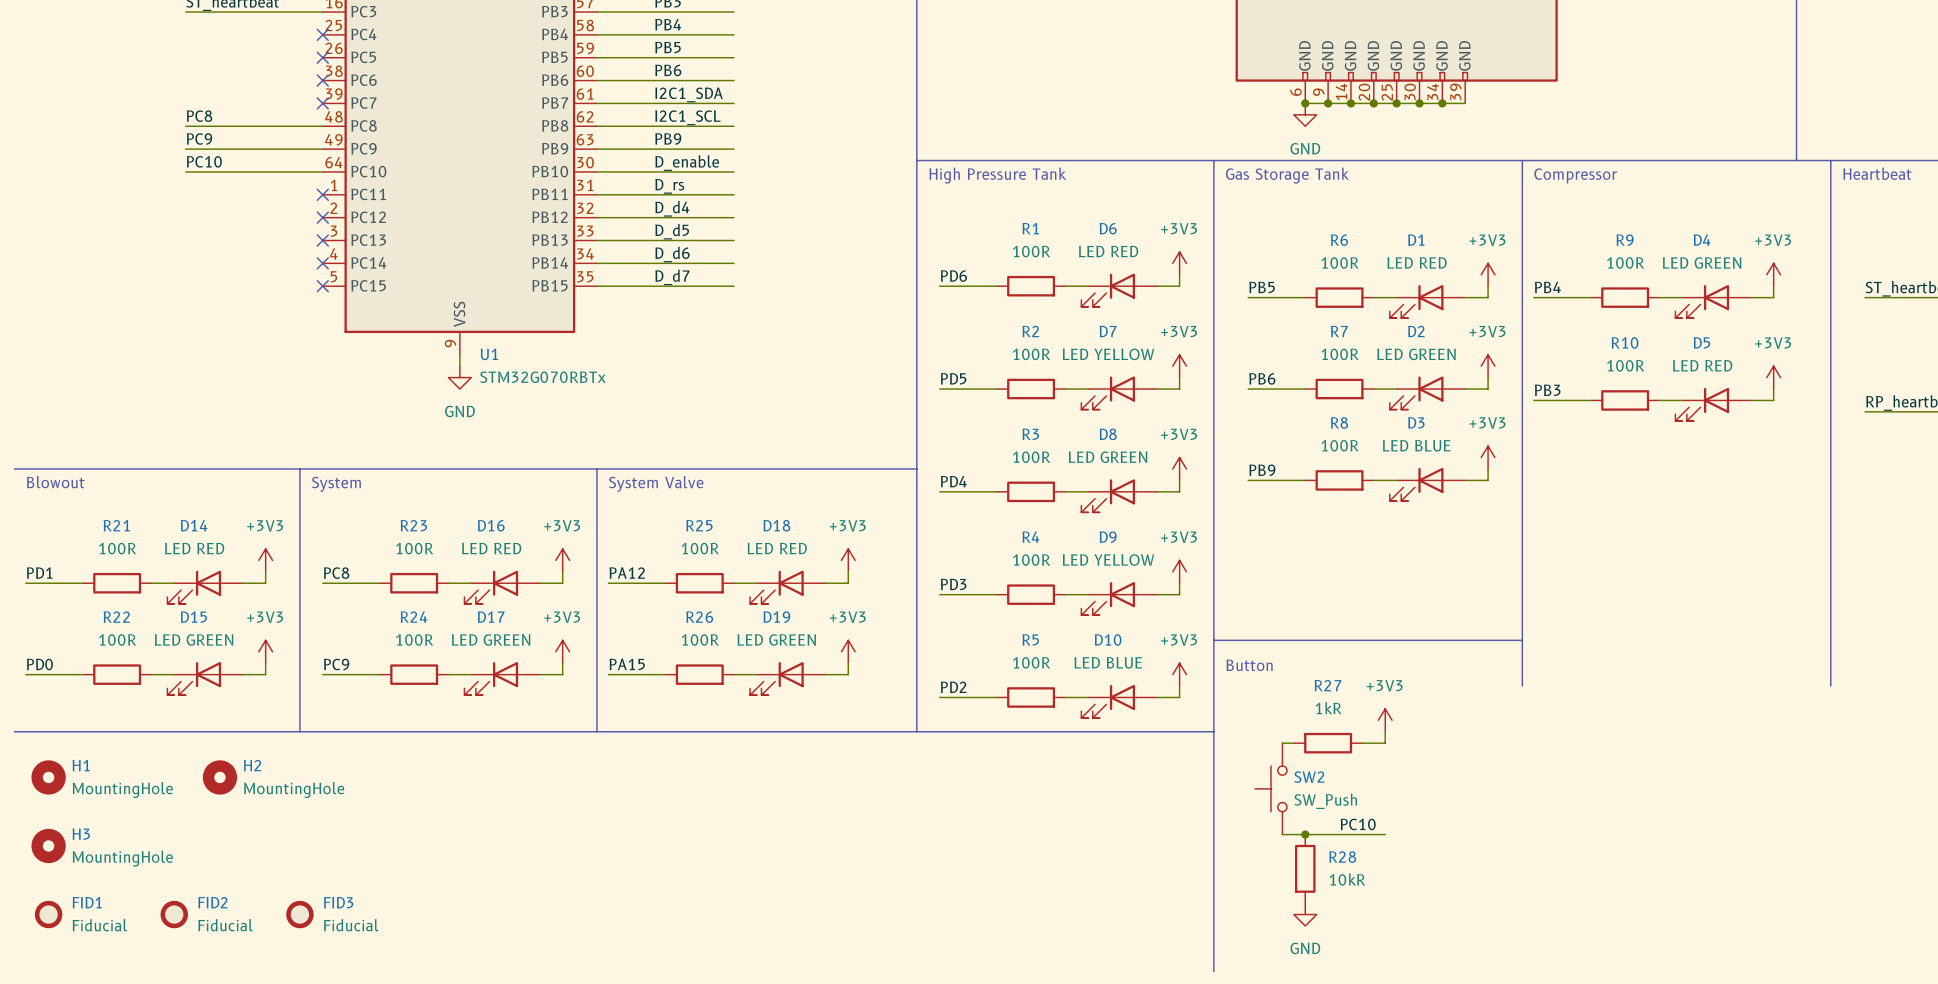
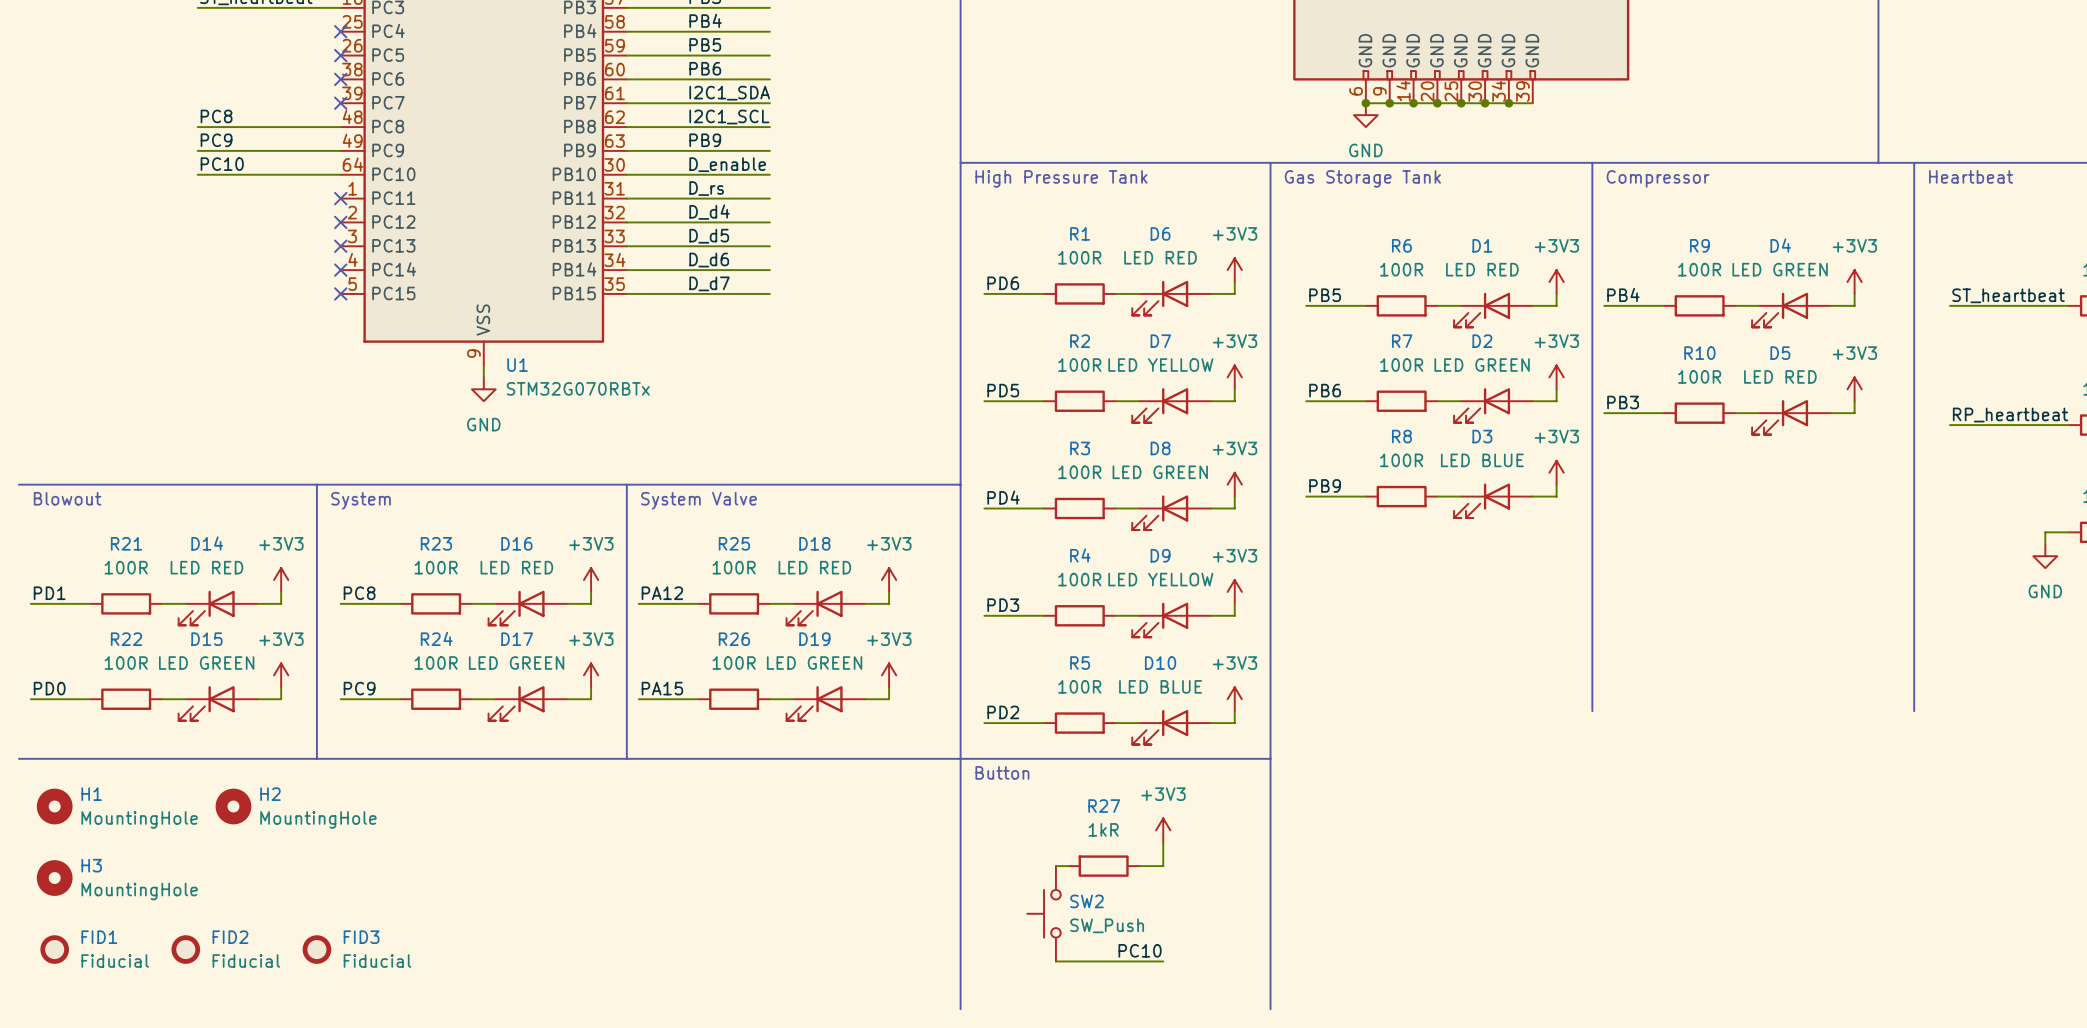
line: (1213, 640) (1522, 640) -> none
text: Button (1249, 665) -> none
power symbol: +3V3 (1385, 720) -> none
line: none -> (960, 758) (960, 1009)
wire: (1385, 731) (1385, 743) (1362, 743) -> none
wire: (1282, 743) (1293, 743) -> none
R27 position: (1328, 743) -> (1103, 866)
text: none -> Button (1002, 772)
SW2 position: (1270, 788) -> (1044, 913)
power symbol: none -> +3V3 (1163, 830)
wire: none -> (1163, 842) (1163, 866) (1139, 866)
label: PC10 (1358, 824) -> none
wire: none -> (1055, 866) (1067, 866)
wire: (1282, 834) (1385, 834) -> none
junction: (1305, 834) -> none
R28: 10kR (1305, 868) -> none
power symbol: GND (1305, 914) -> none
label: none -> PC10 (1140, 950)
wire: none -> (1055, 961) (1163, 961)

